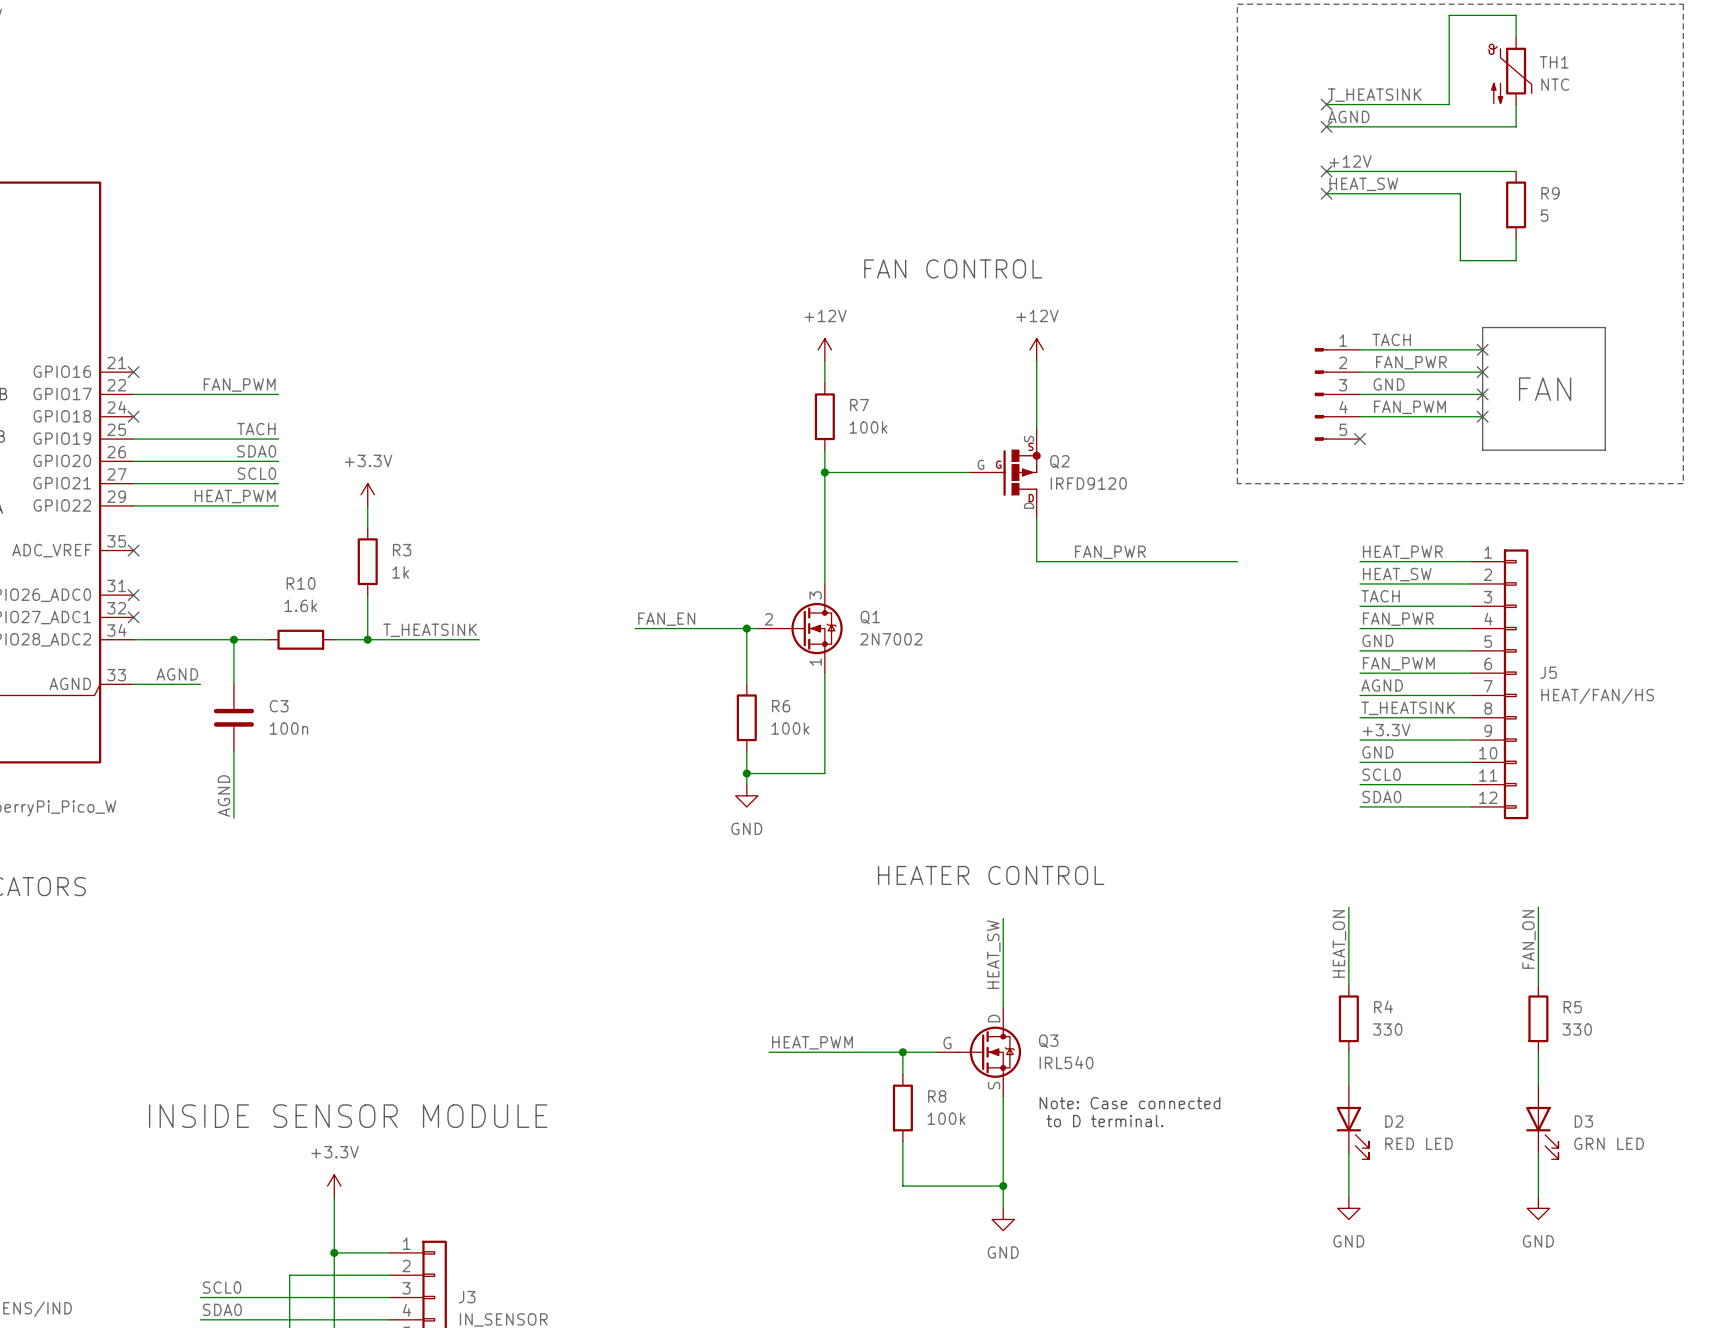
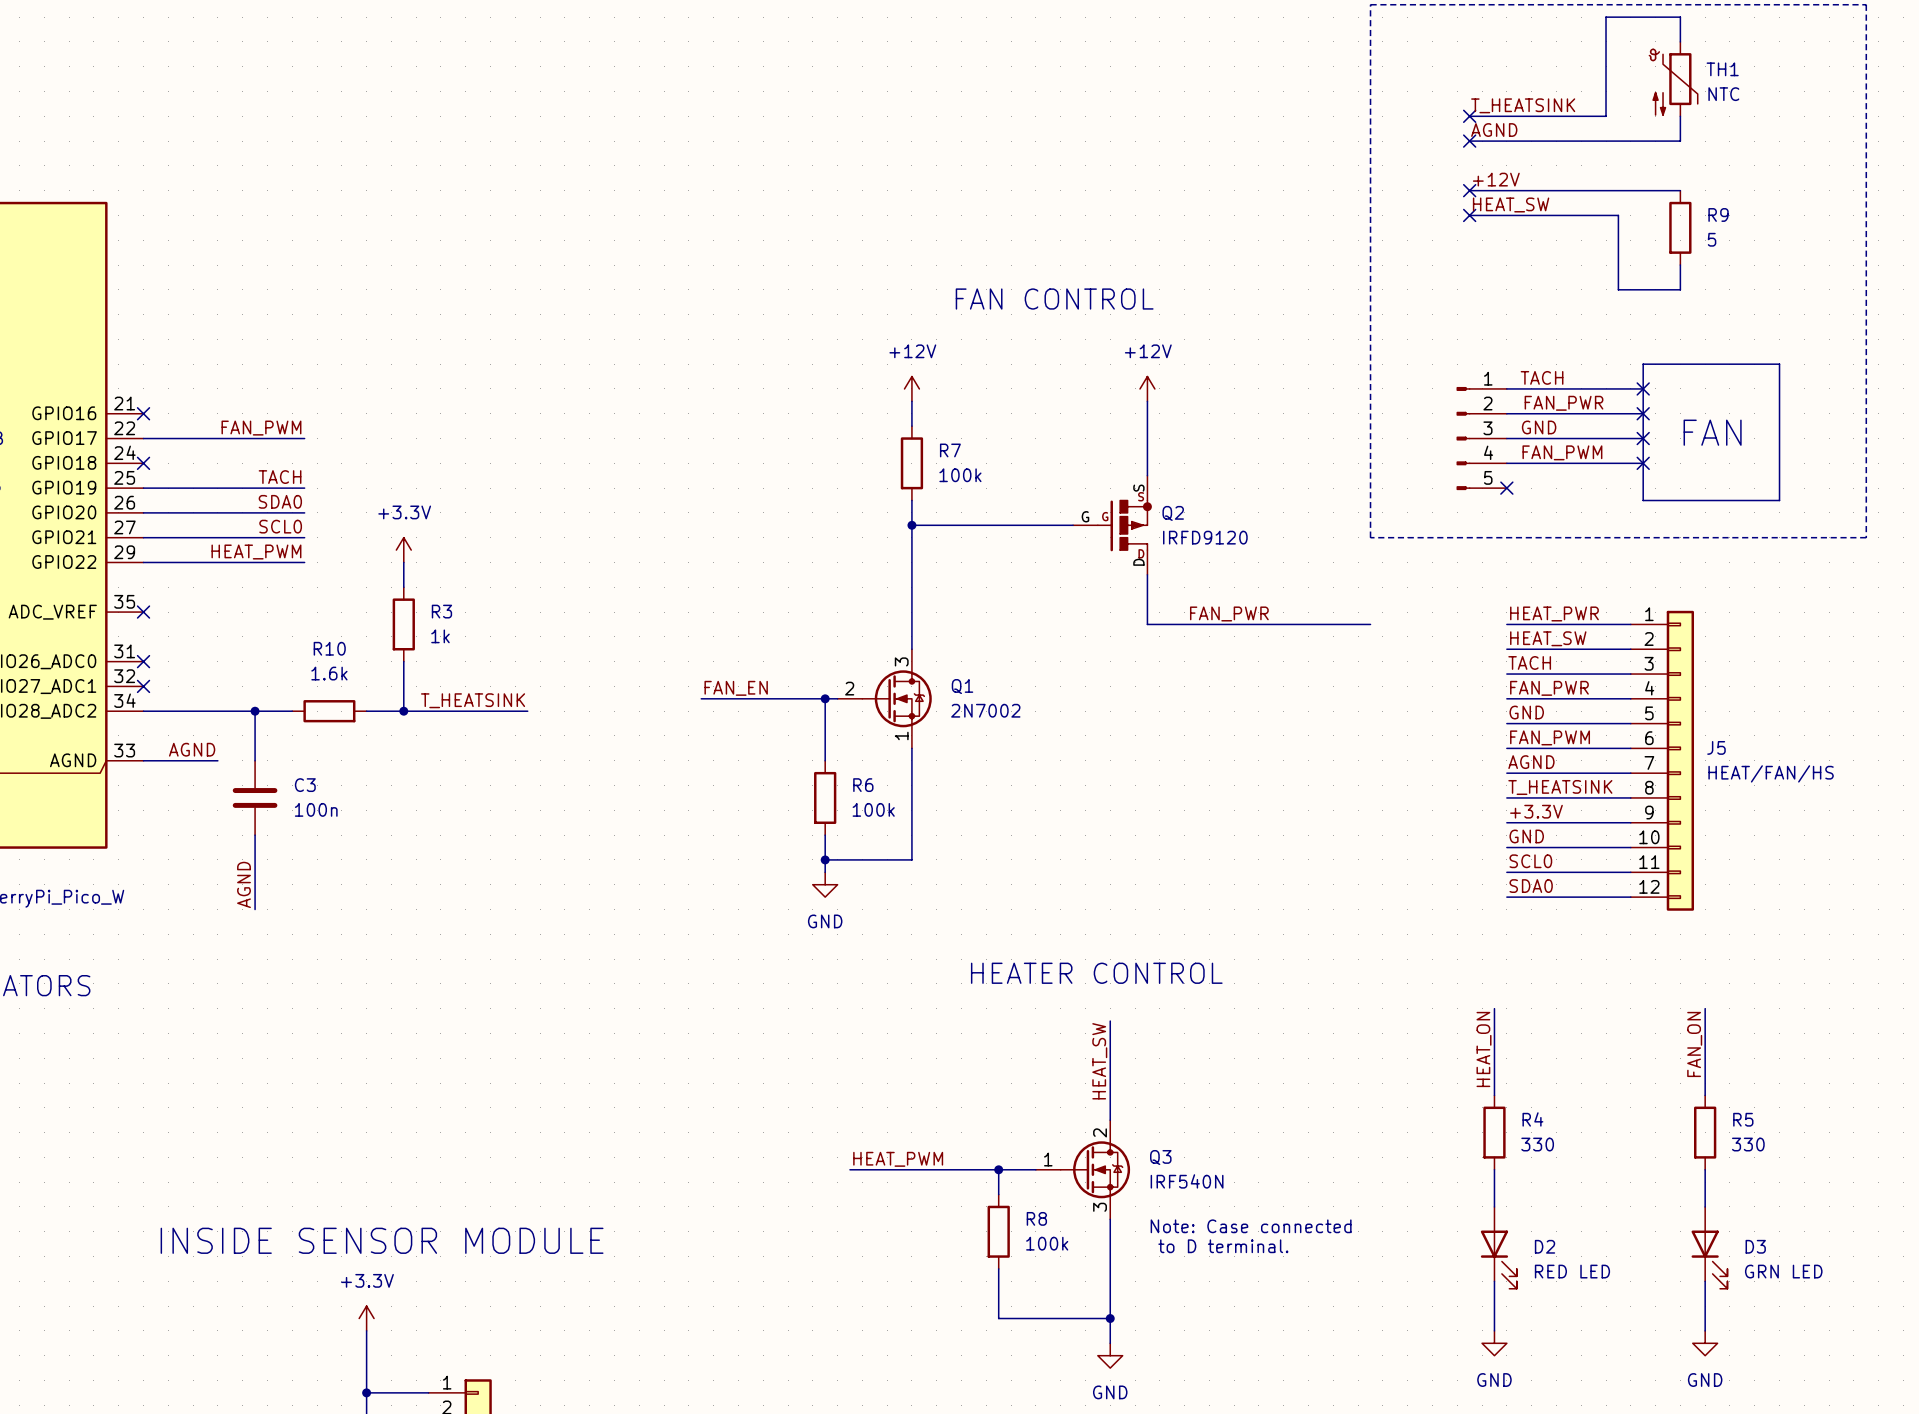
Q3 pin name: D (994, 1018) -> none
Q3 pin number: none -> 2 (1100, 1132)
Q3 pin name: G (947, 1043) -> none
Q3 pin number: none -> 1 (1048, 1159)
Q3 value: IRL540 (1066, 1062) -> IRF540N (1187, 1181)
Q3 pin name: S (994, 1085) -> none
Q3 pin number: none -> 3 (1100, 1207)

